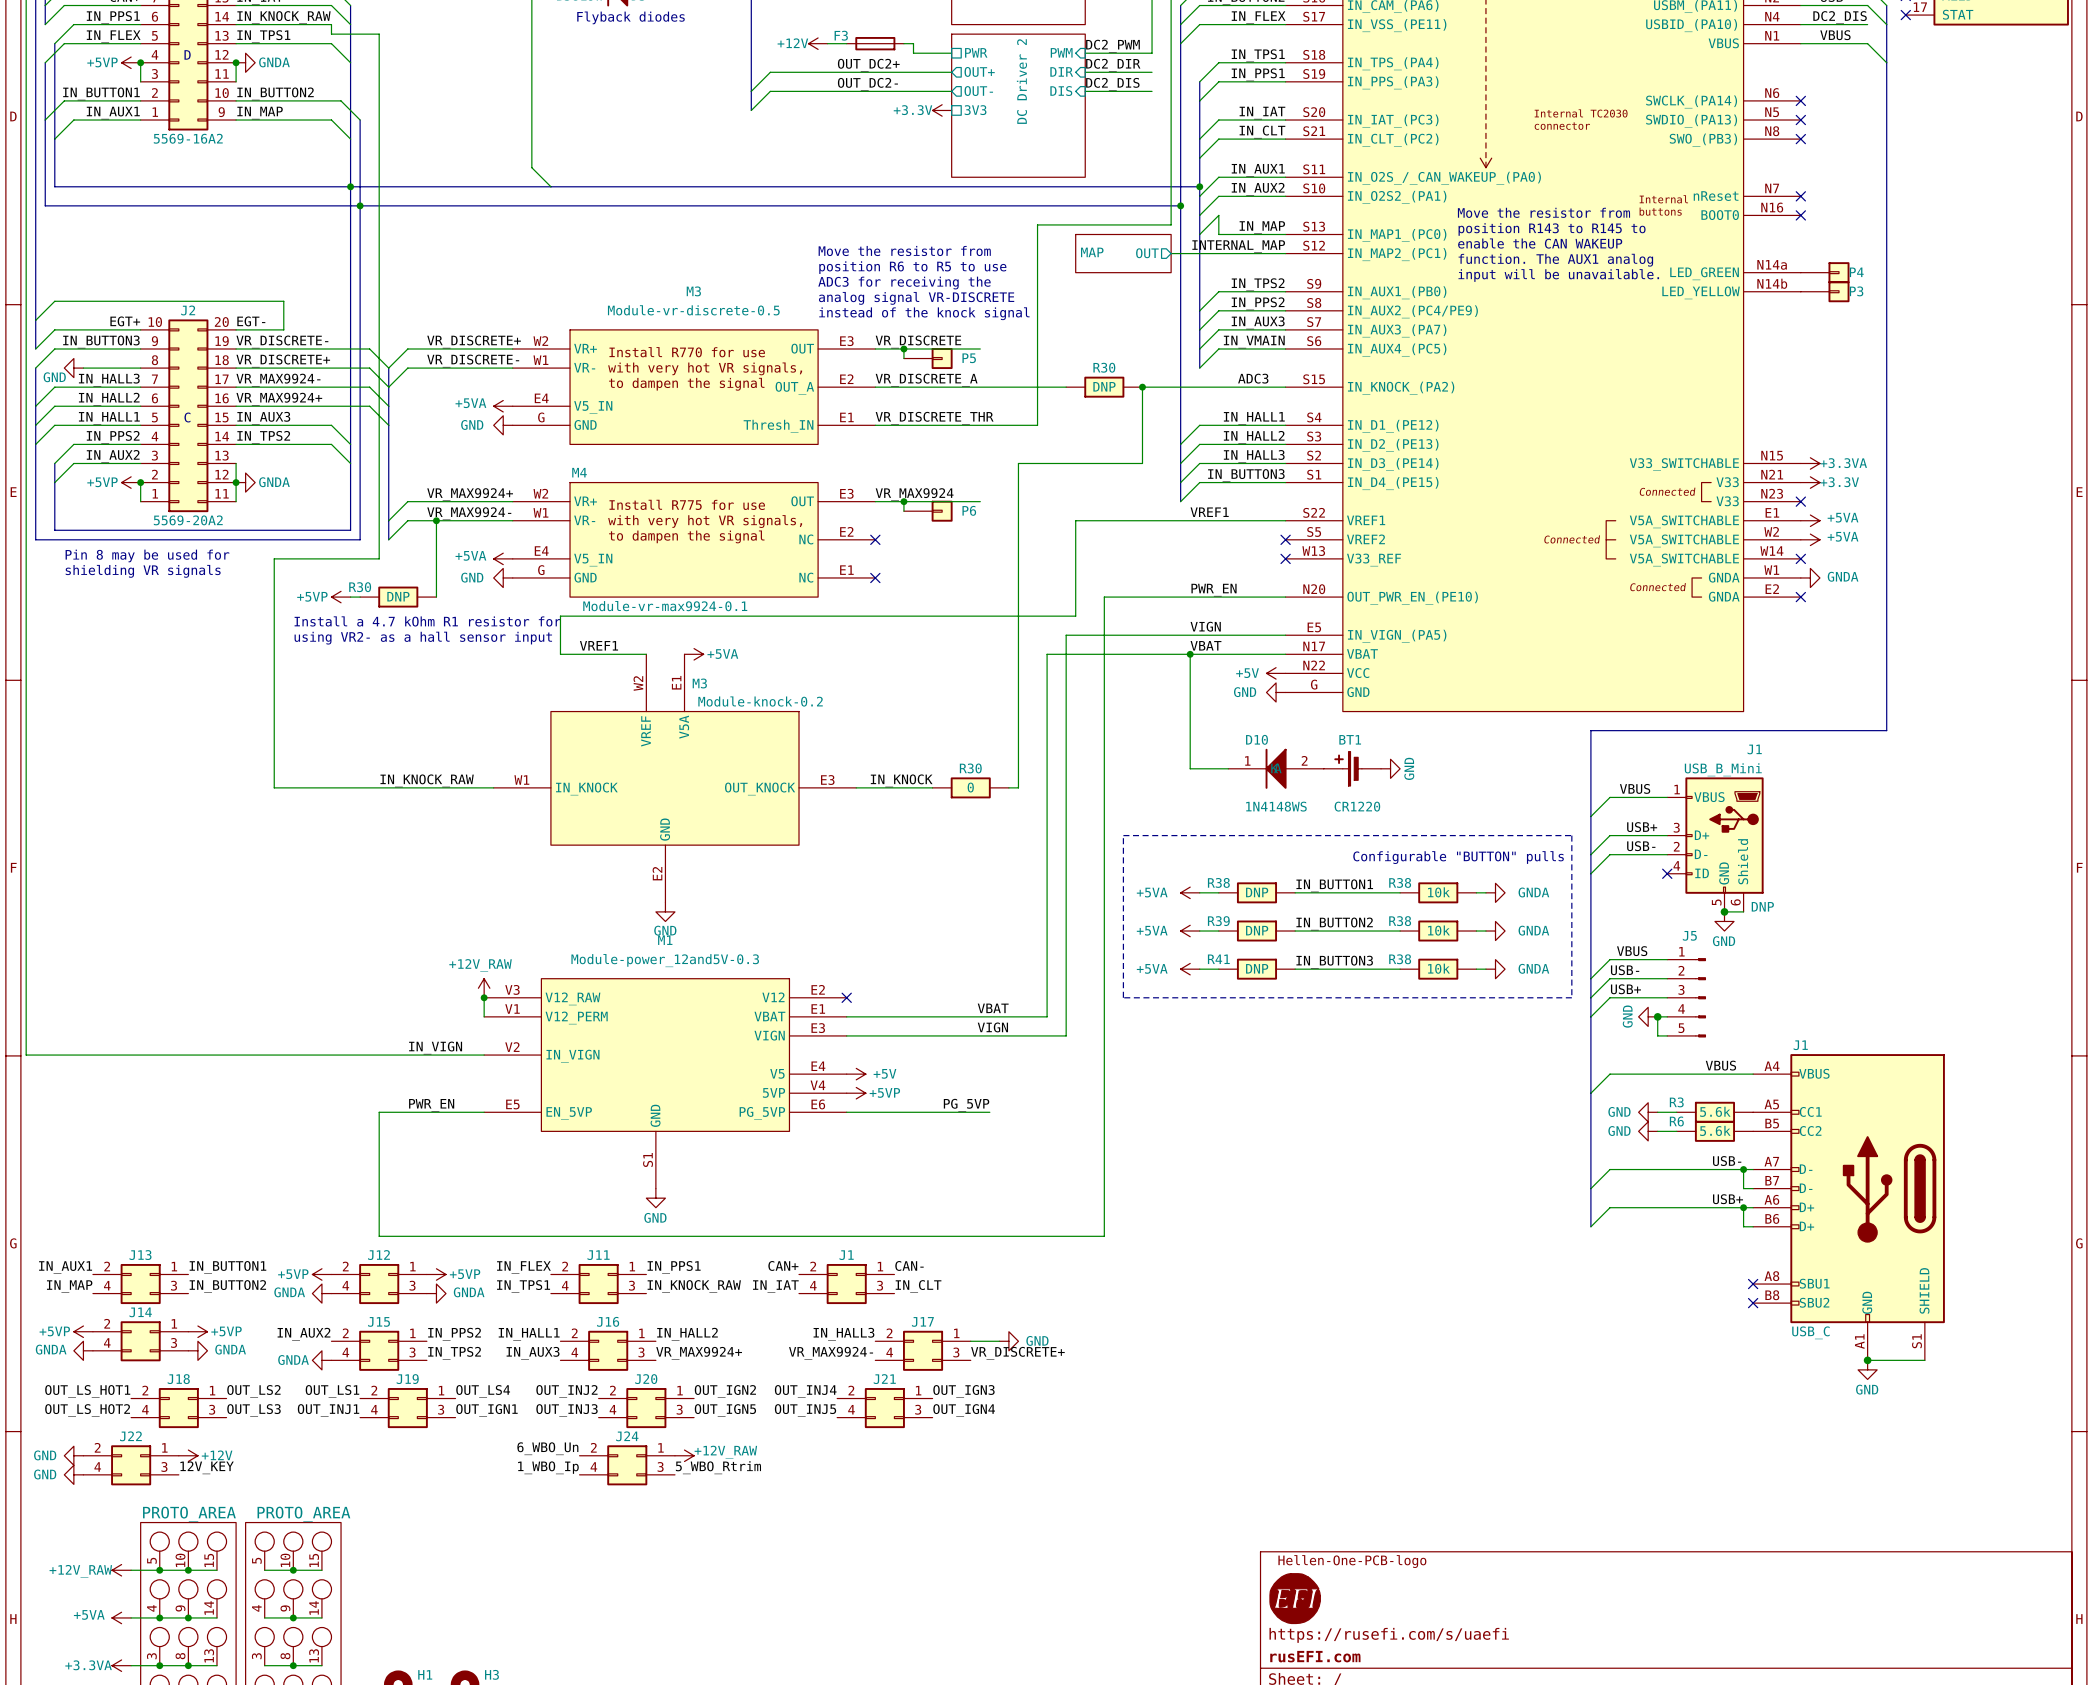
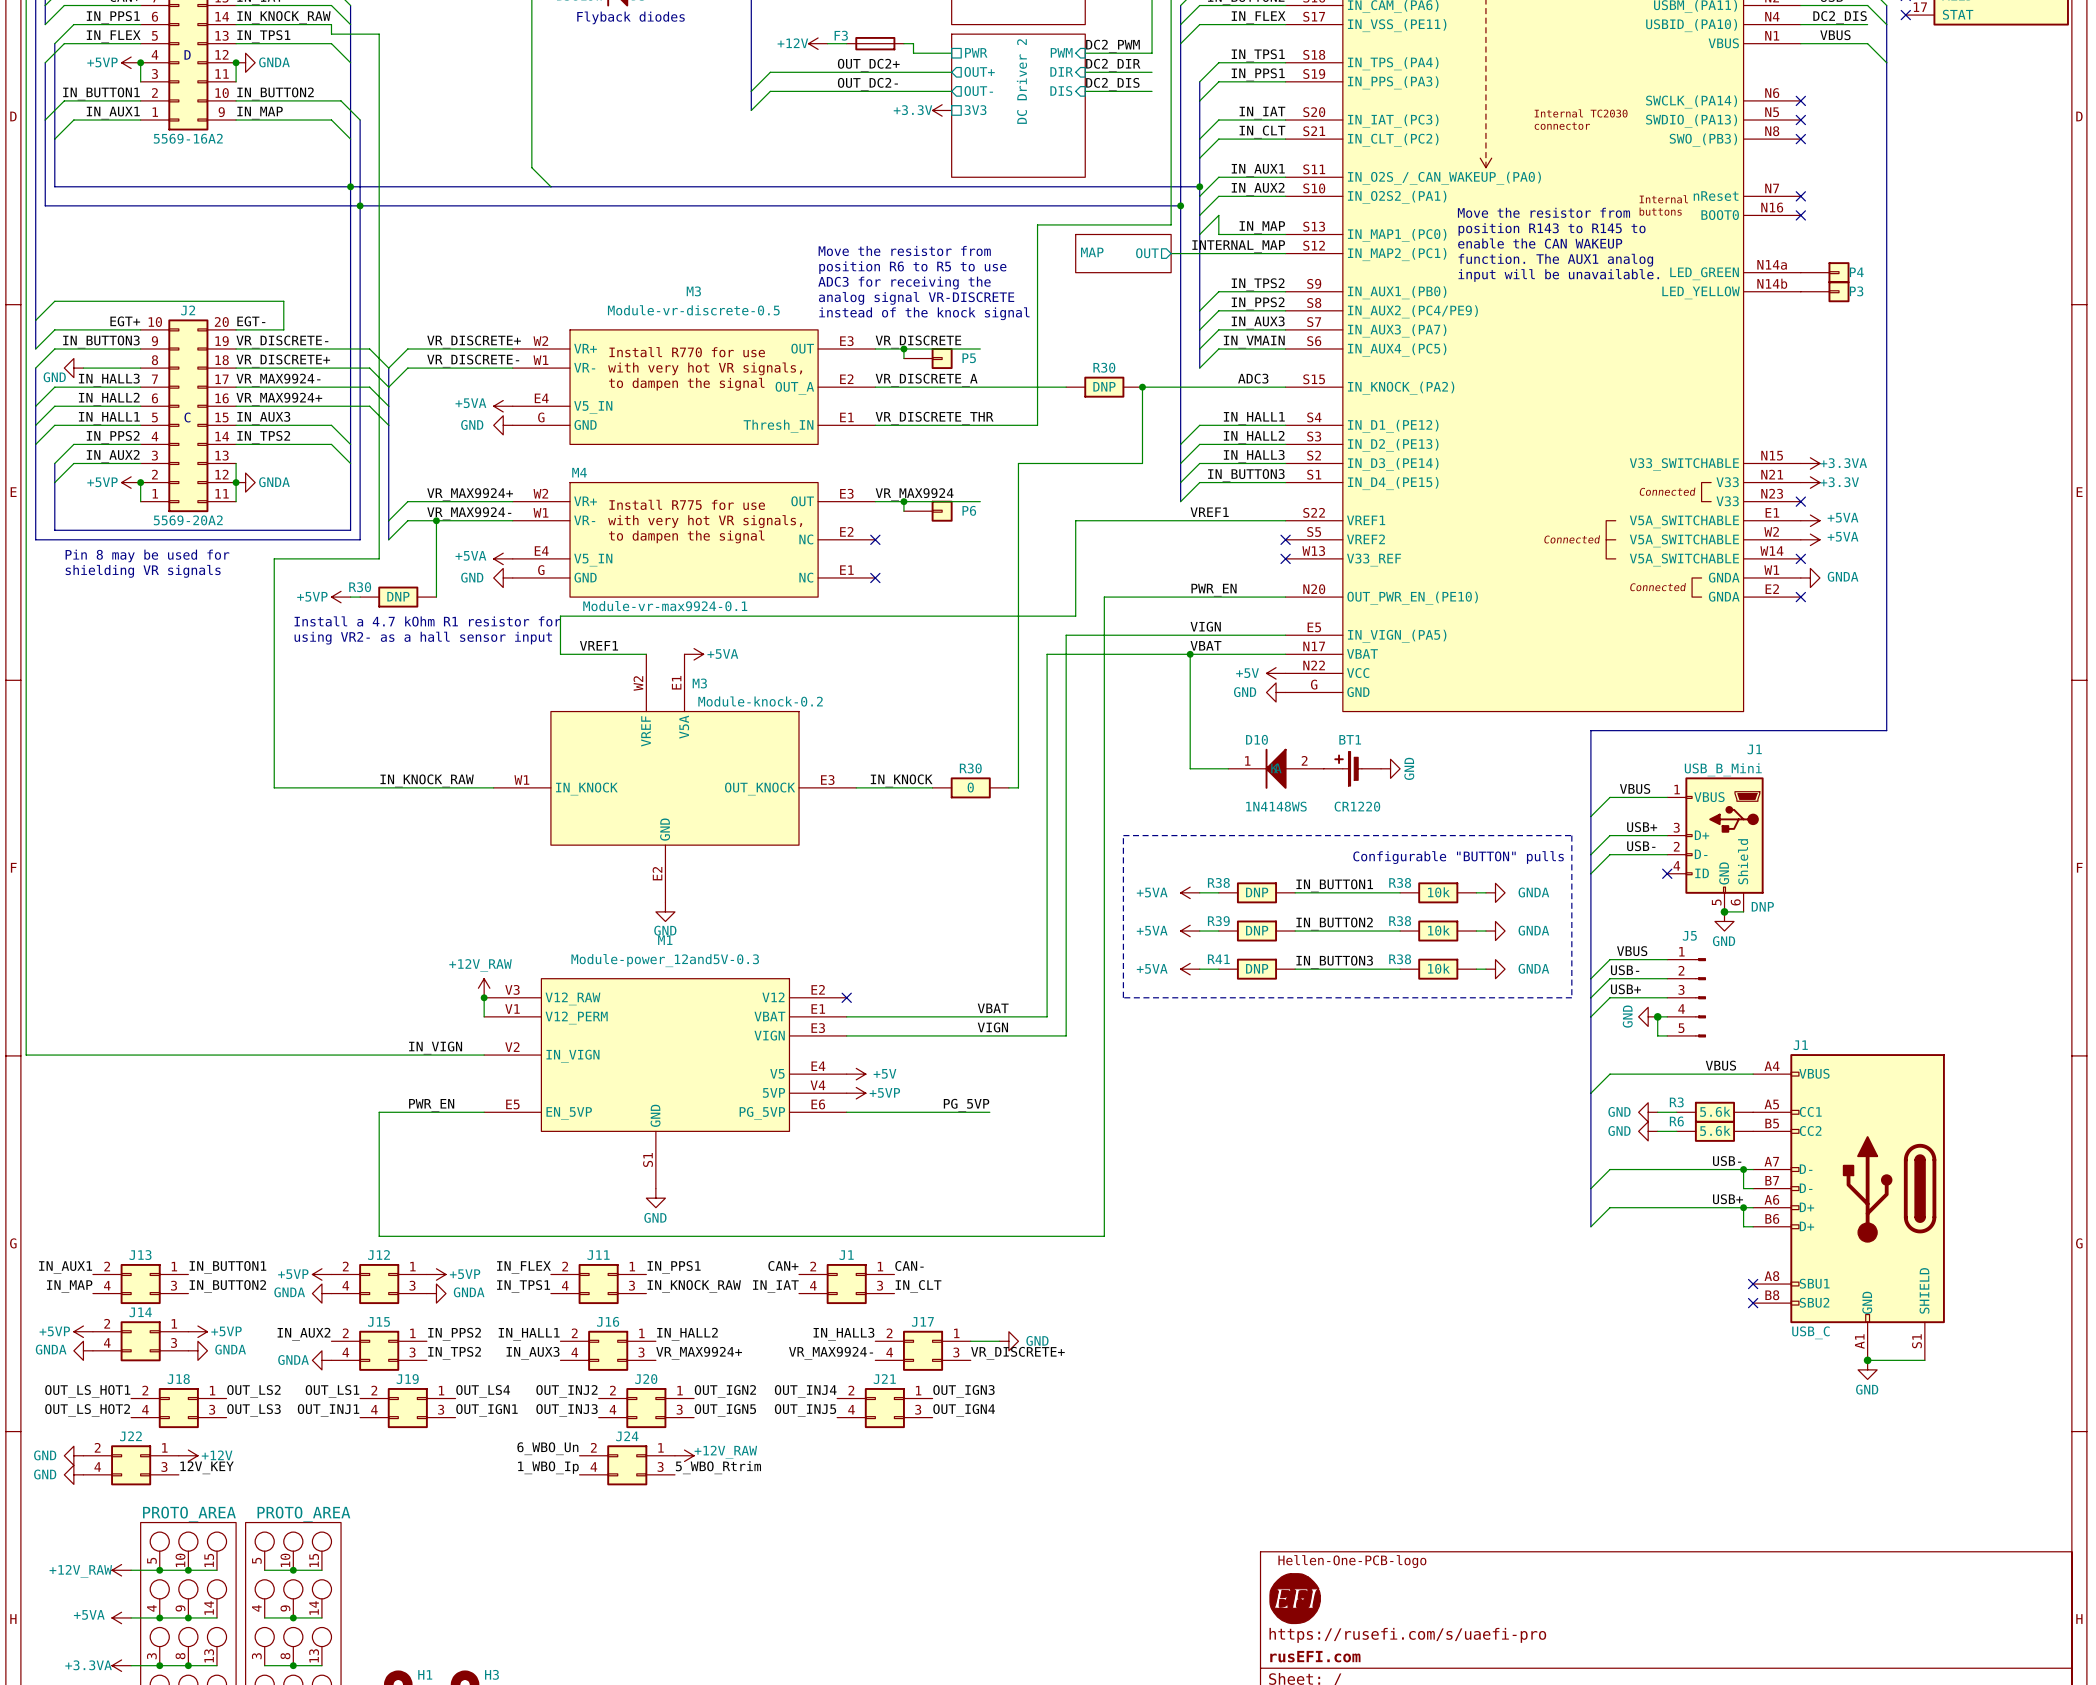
title block: https://rusefi.com/s/uaefi (1389, 1635) -> https://rusefi.com/s/uaefi-pro (1407, 1635)

